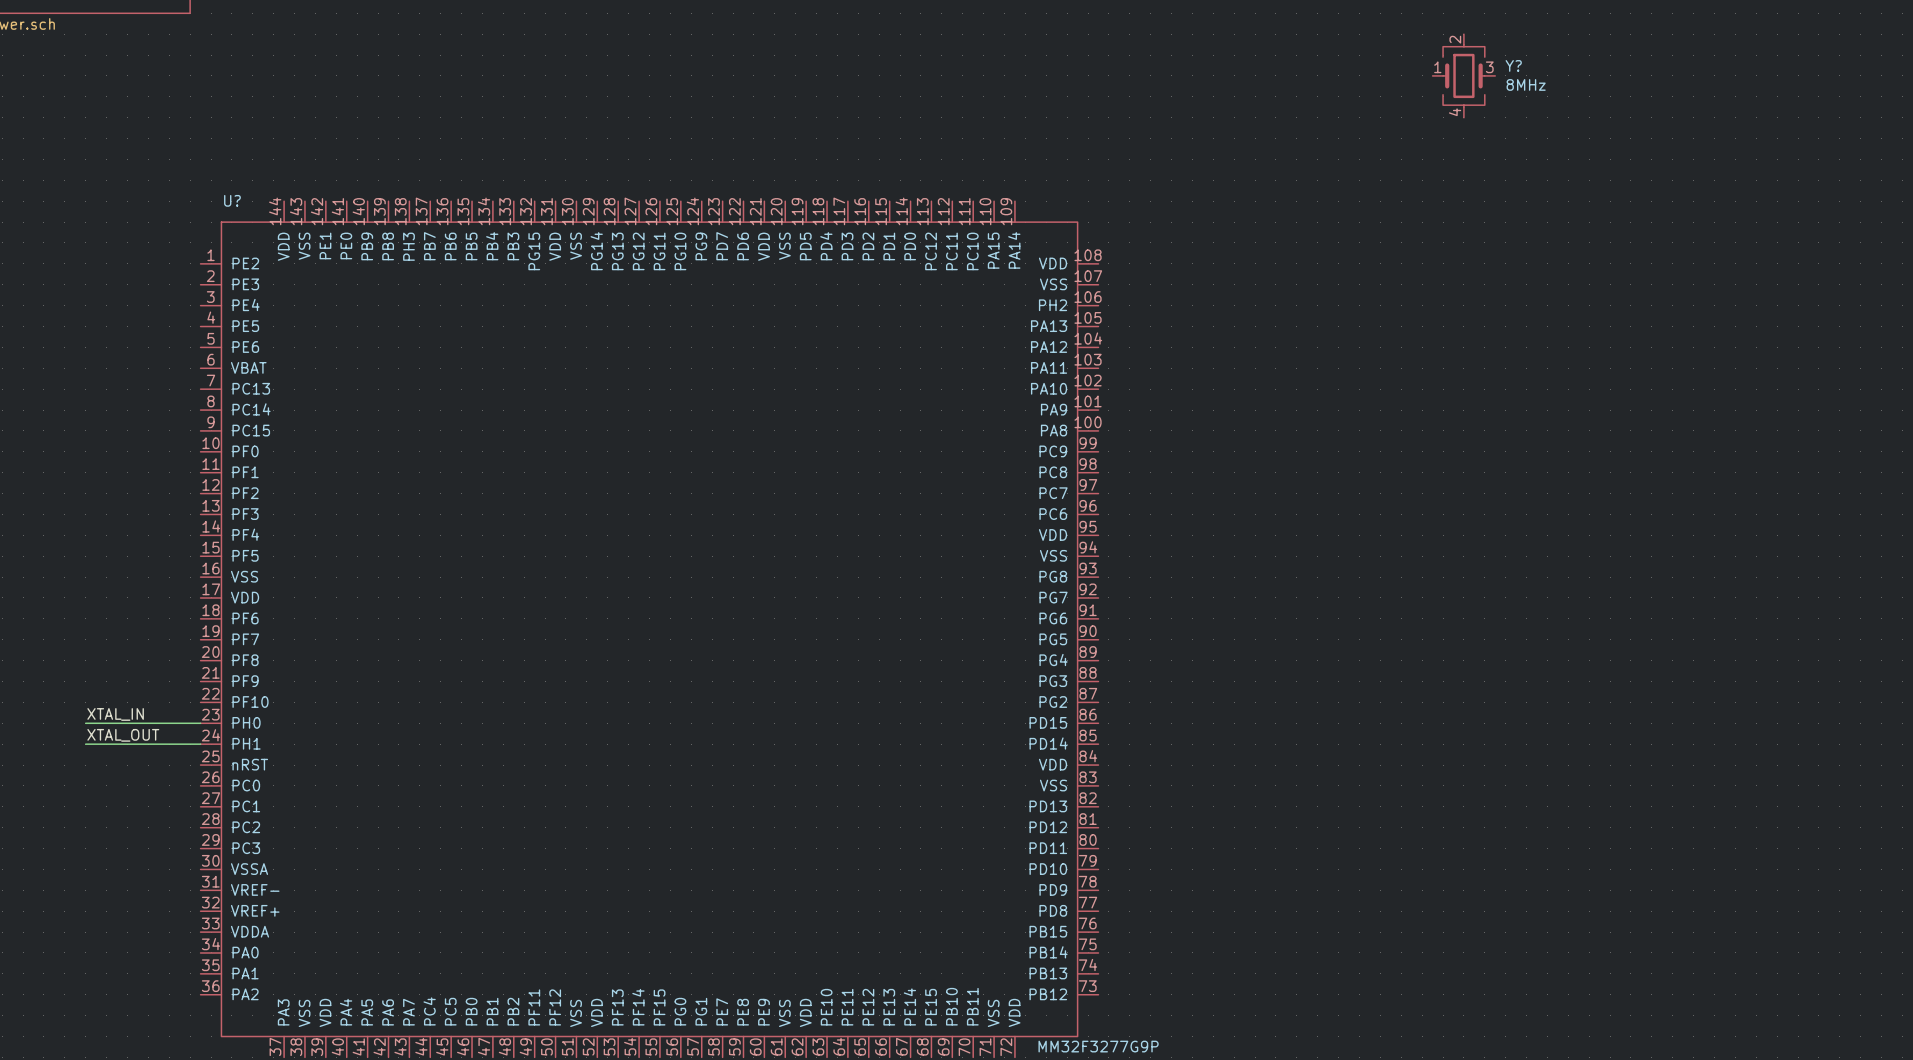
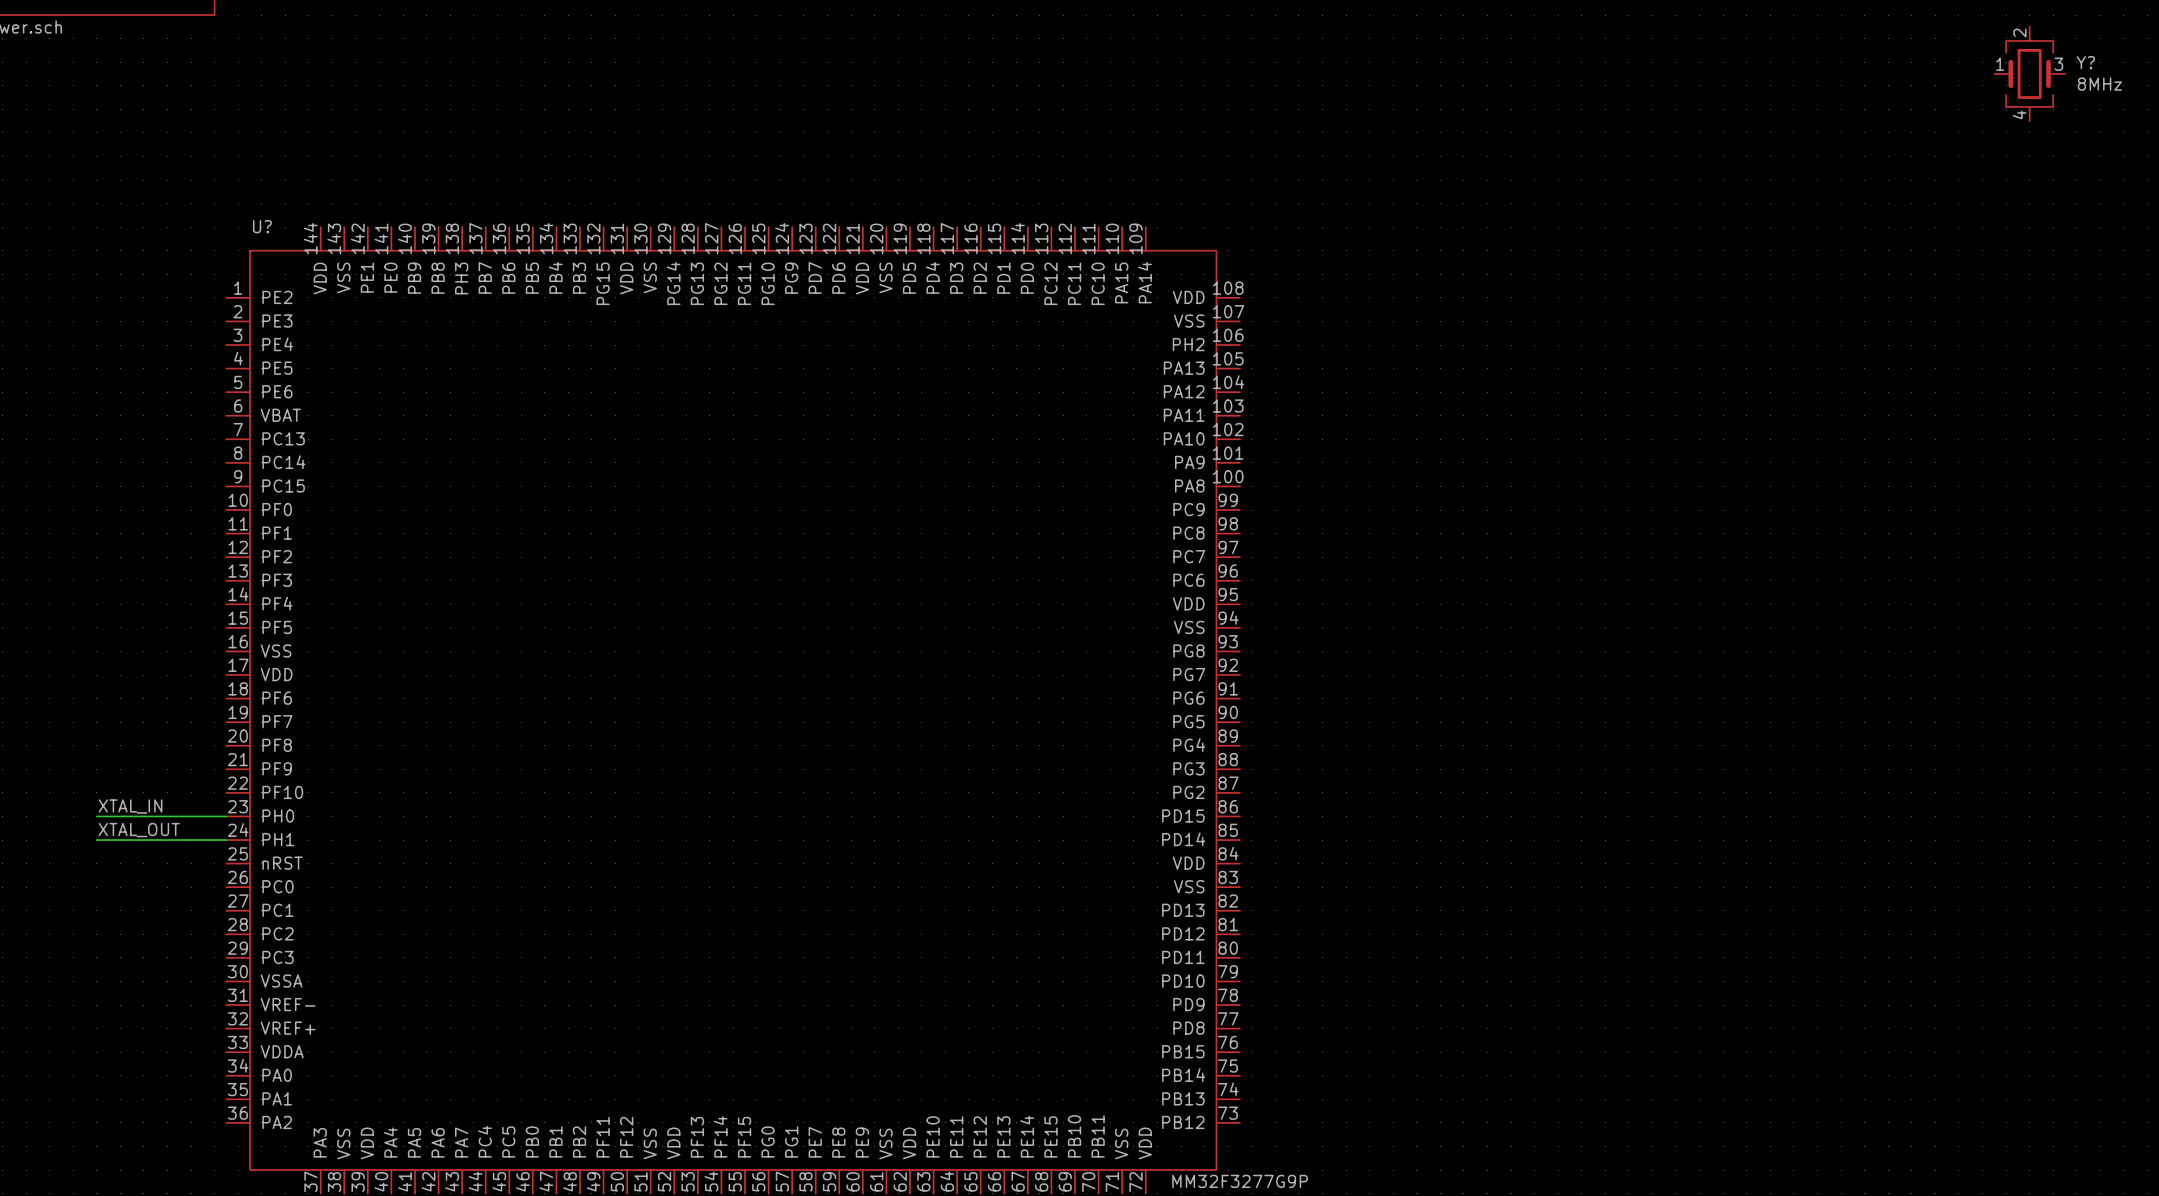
Y?: none -> 8MHz (2029, 73)
Y?: 8MHz (1463, 75) -> none

